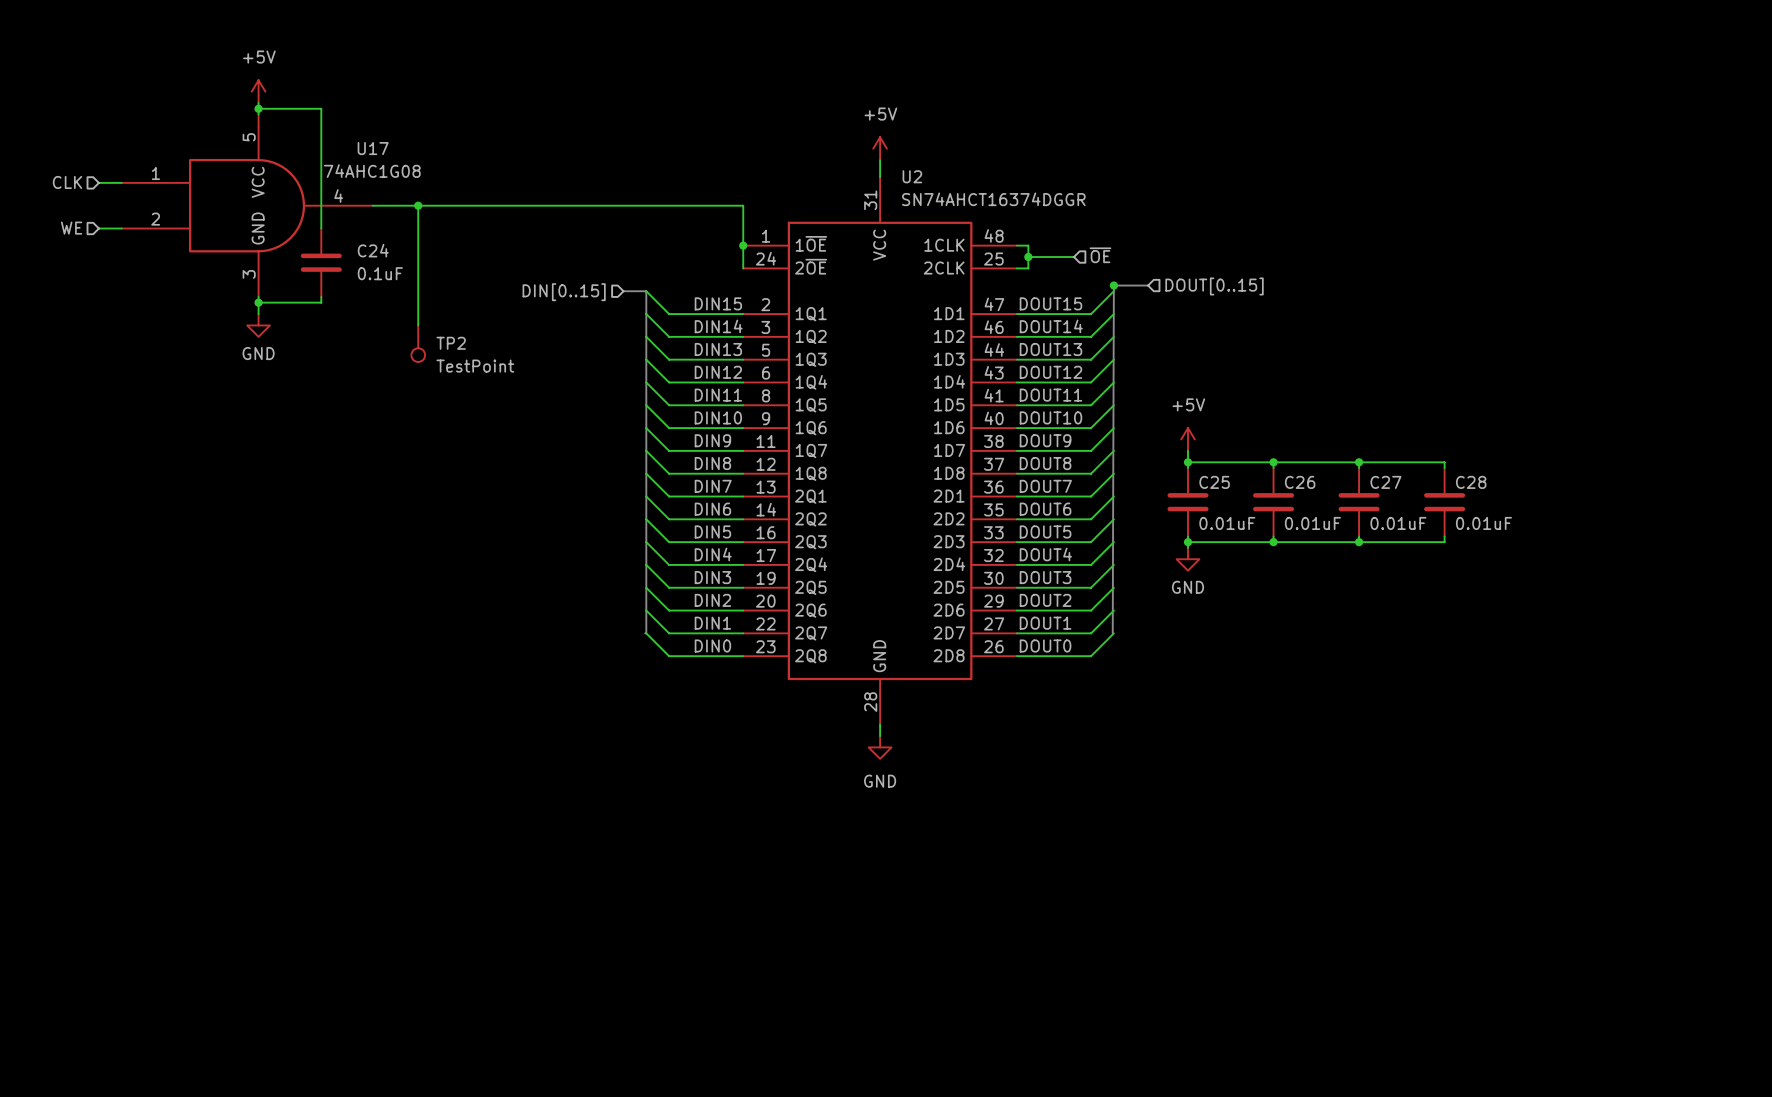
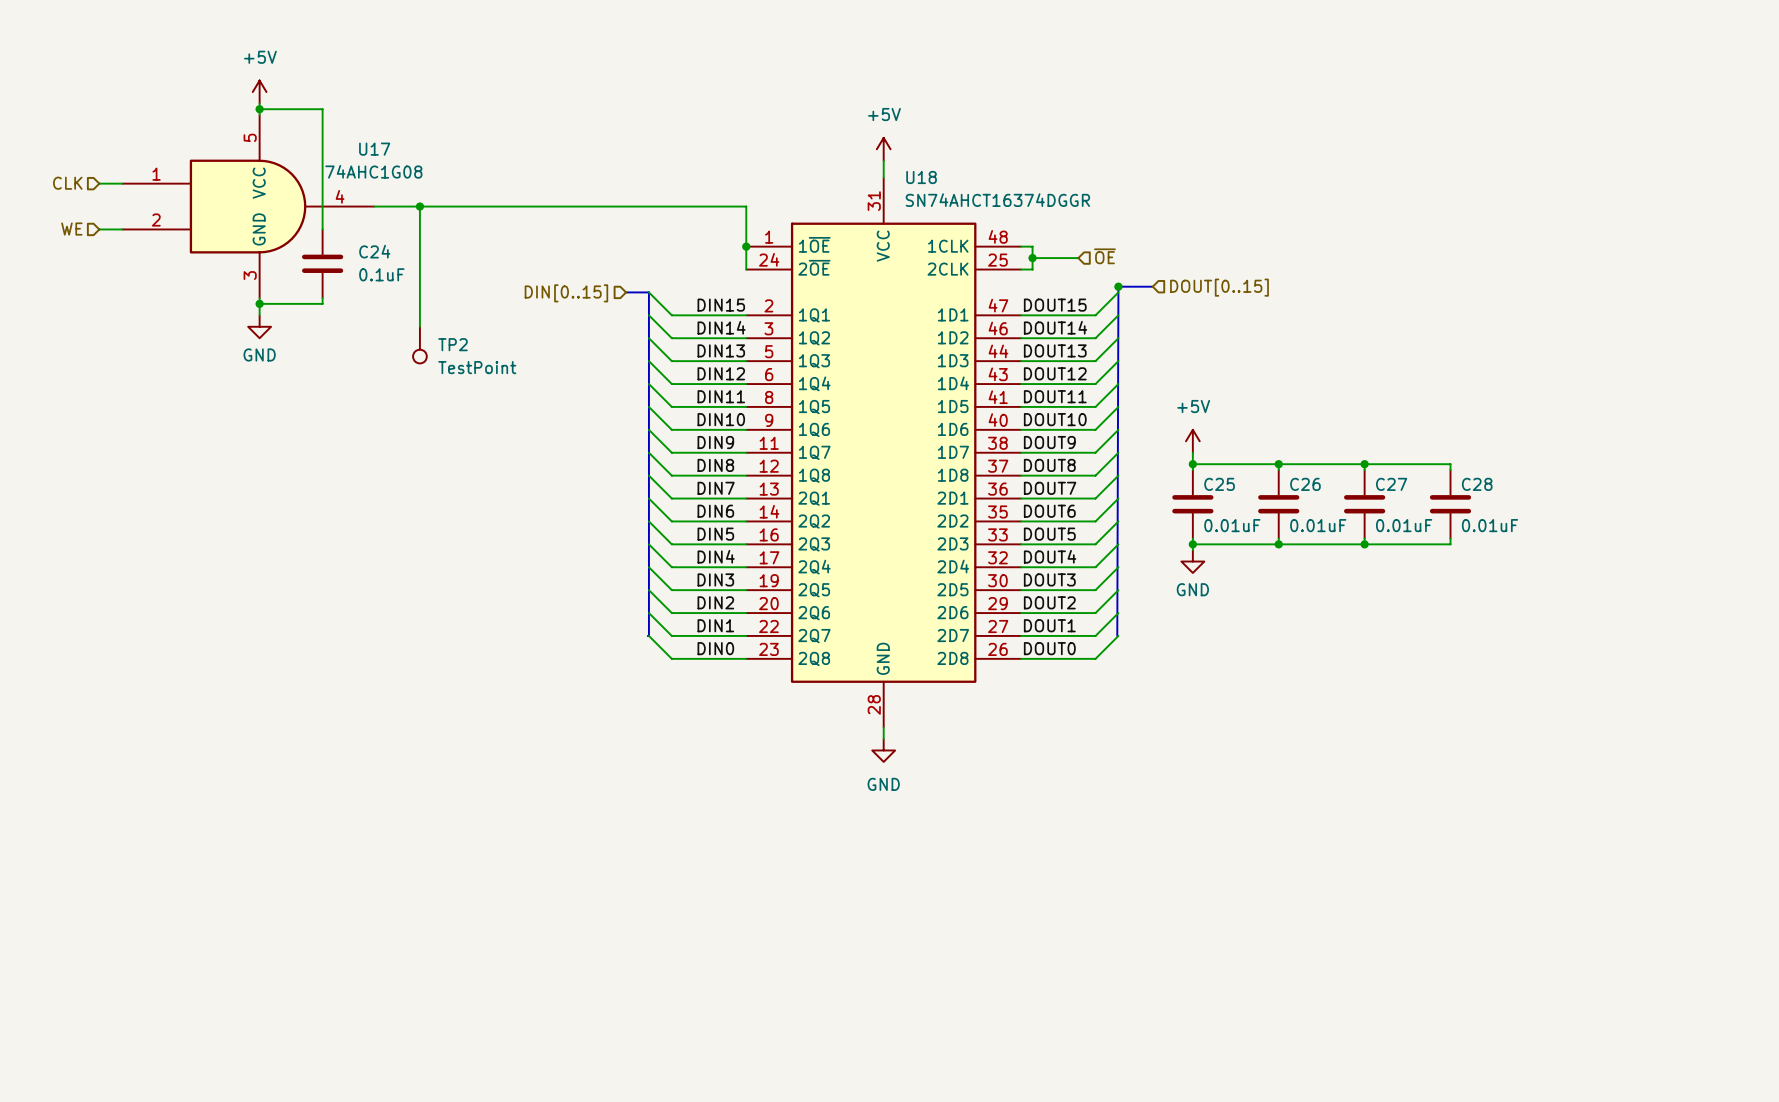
U2 name: U2 (912, 176) -> U18 (921, 177)

